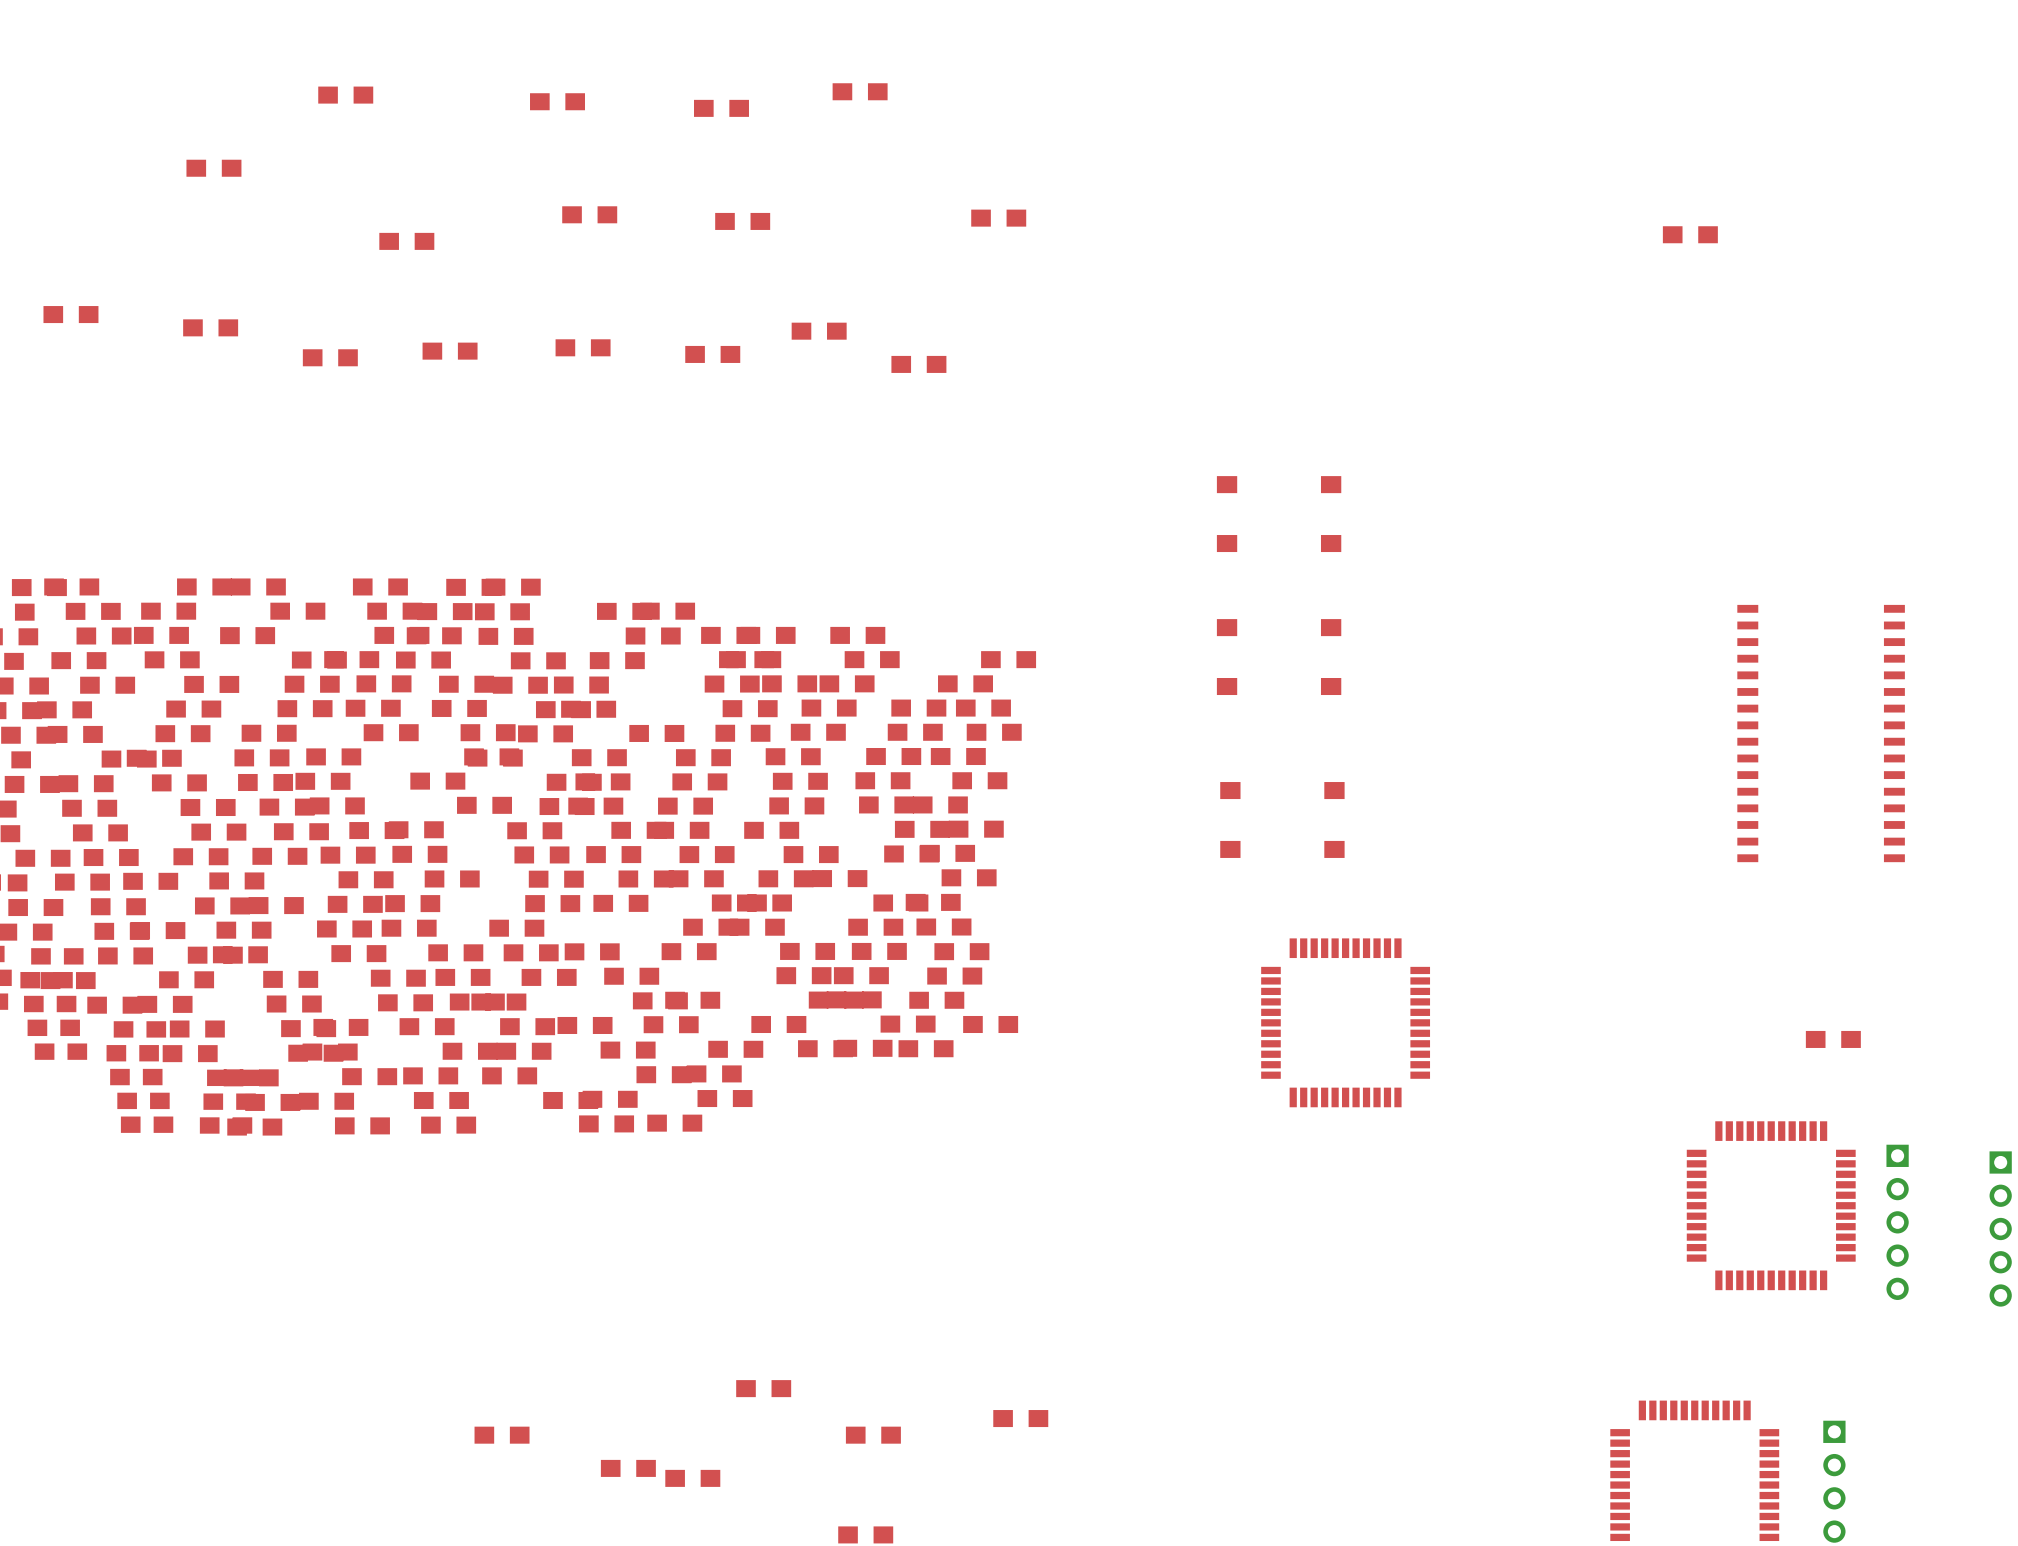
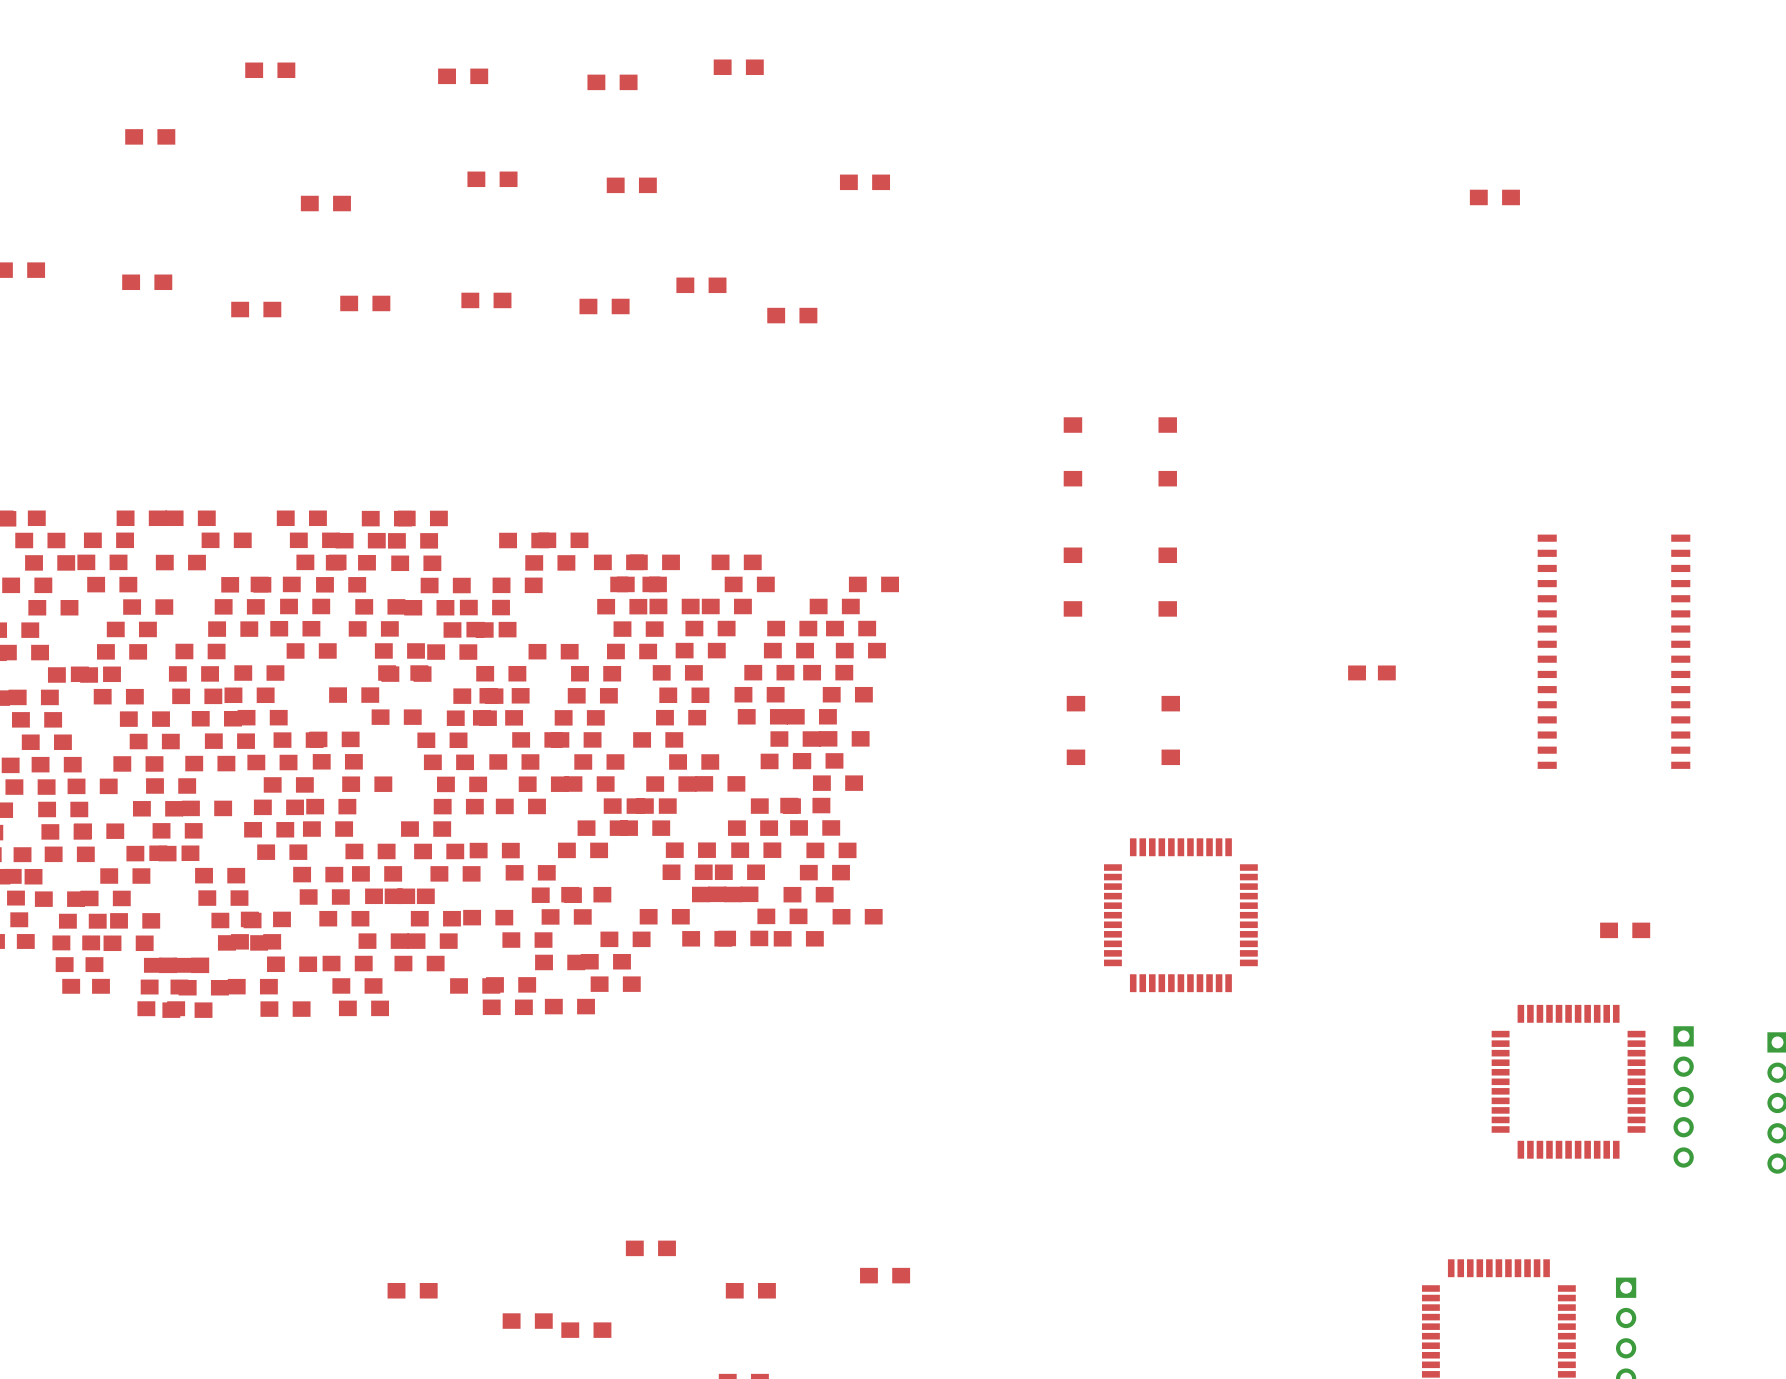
part: none -> (1371, 672)
part: (147, 1124) -> none

